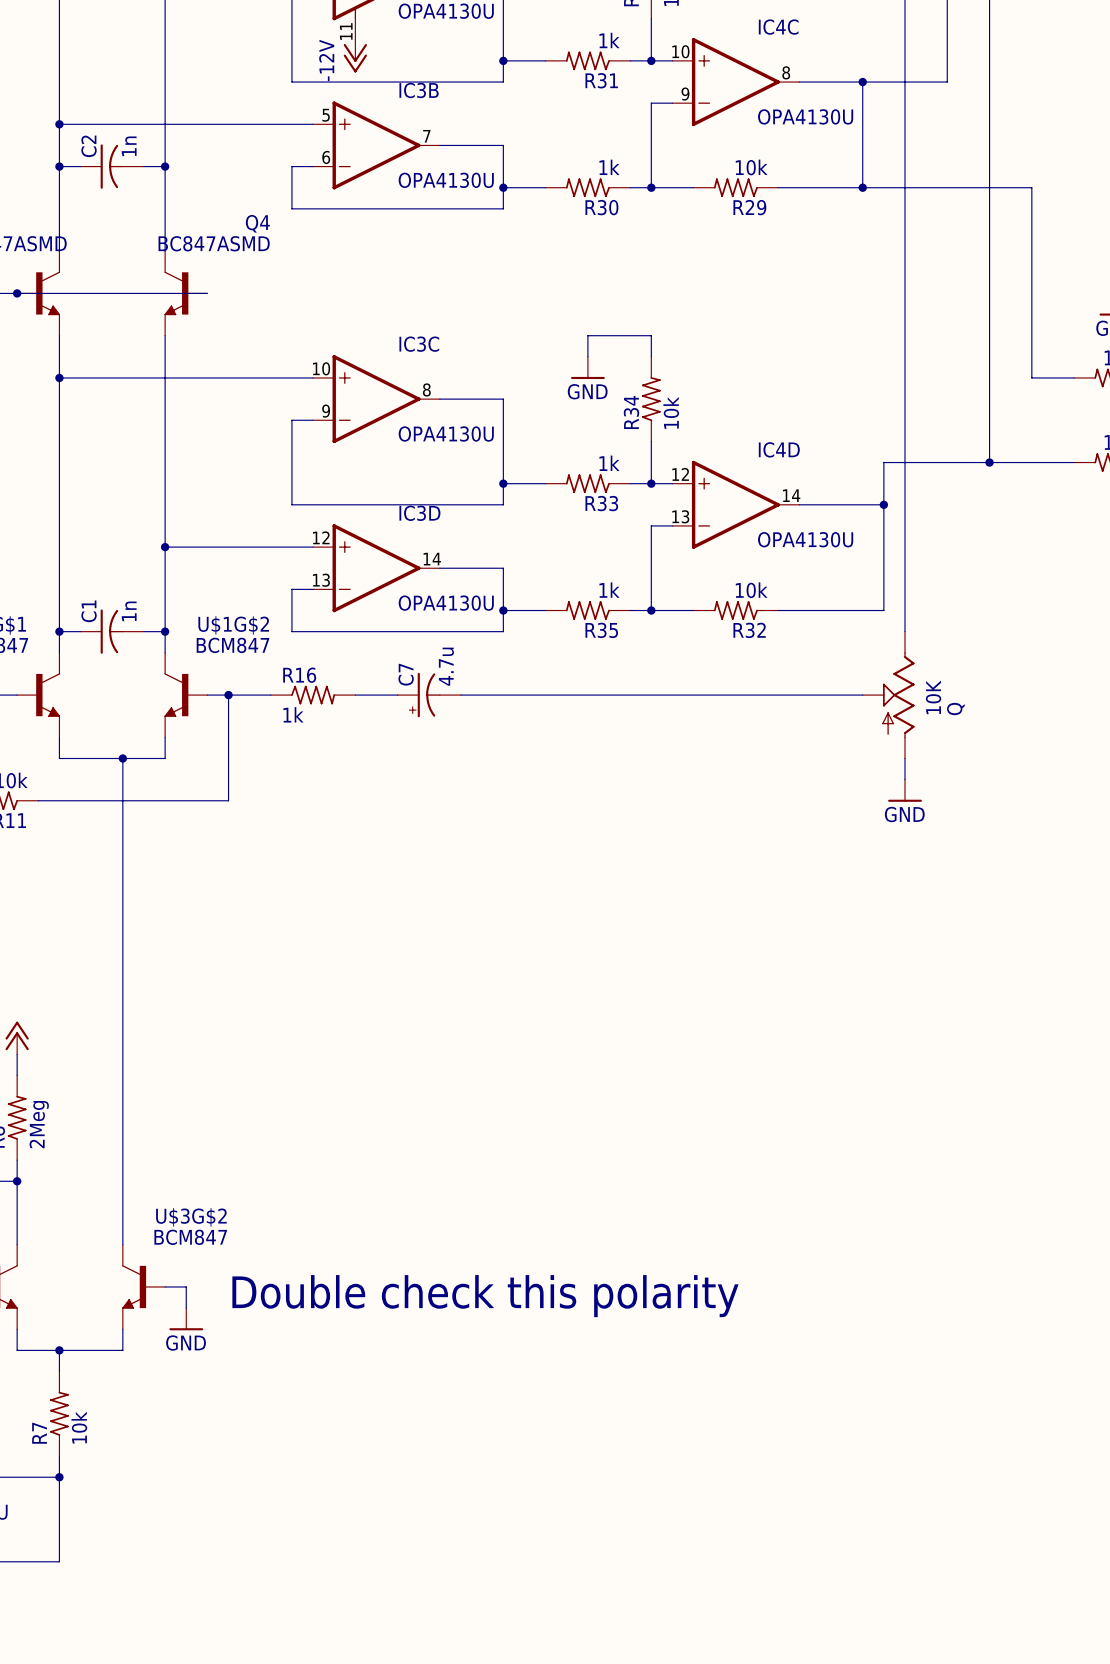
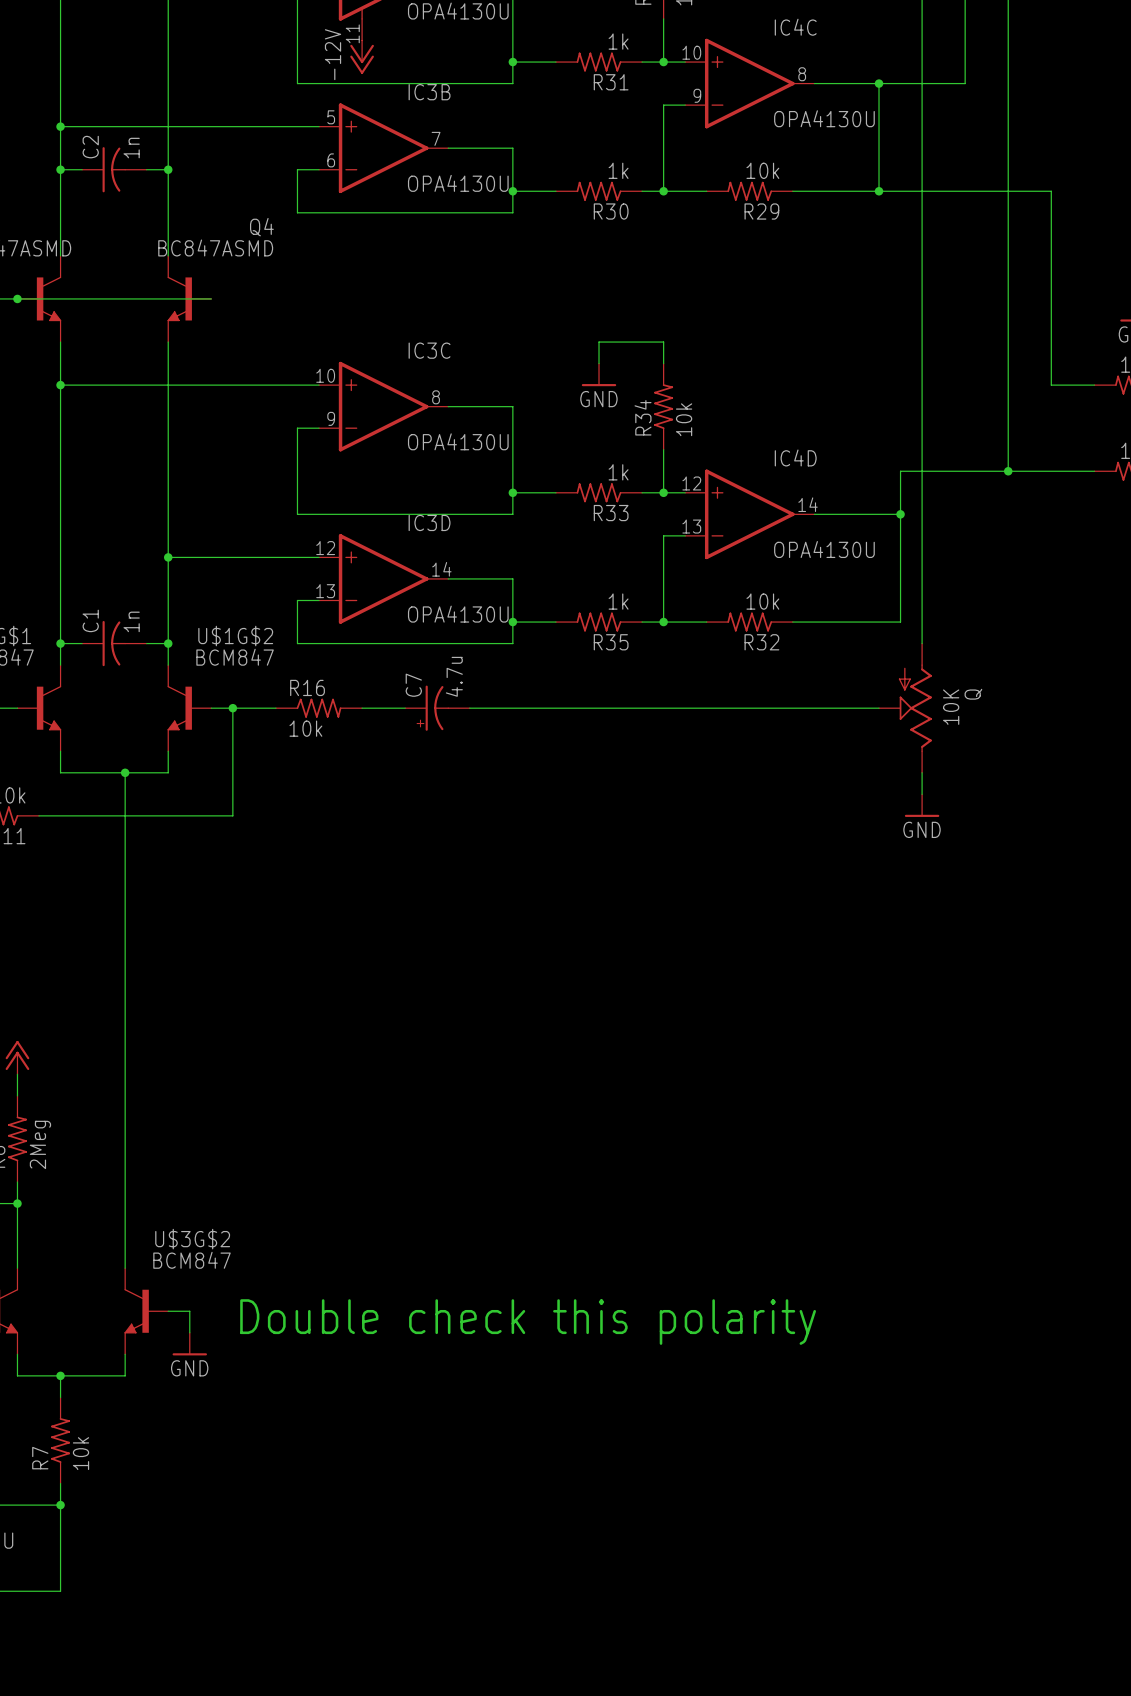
Q flip: as is (898, 695) -> up-down (915, 708)
R16 value: 1k (293, 714) -> 10k (305, 728)

